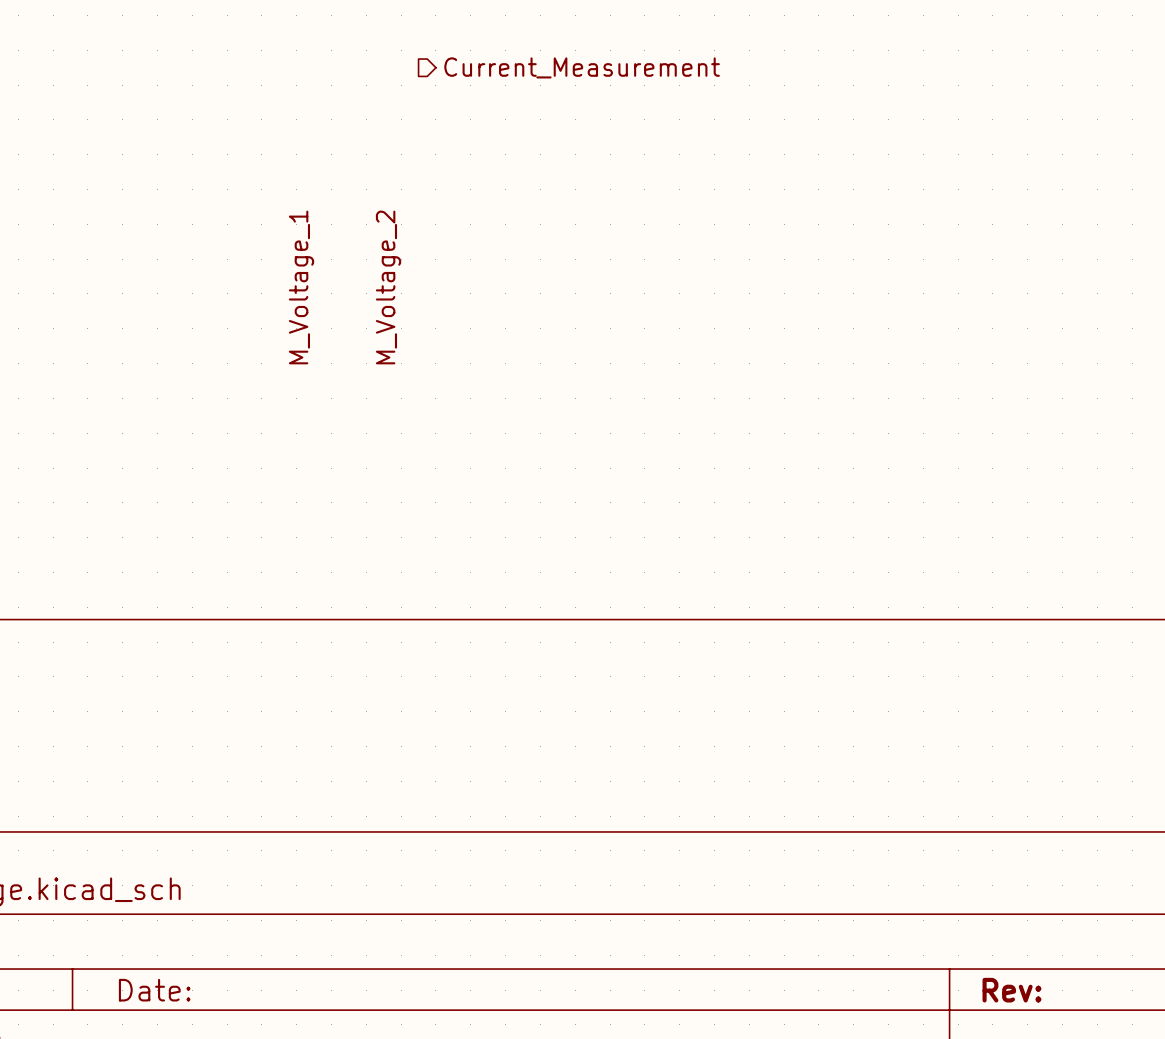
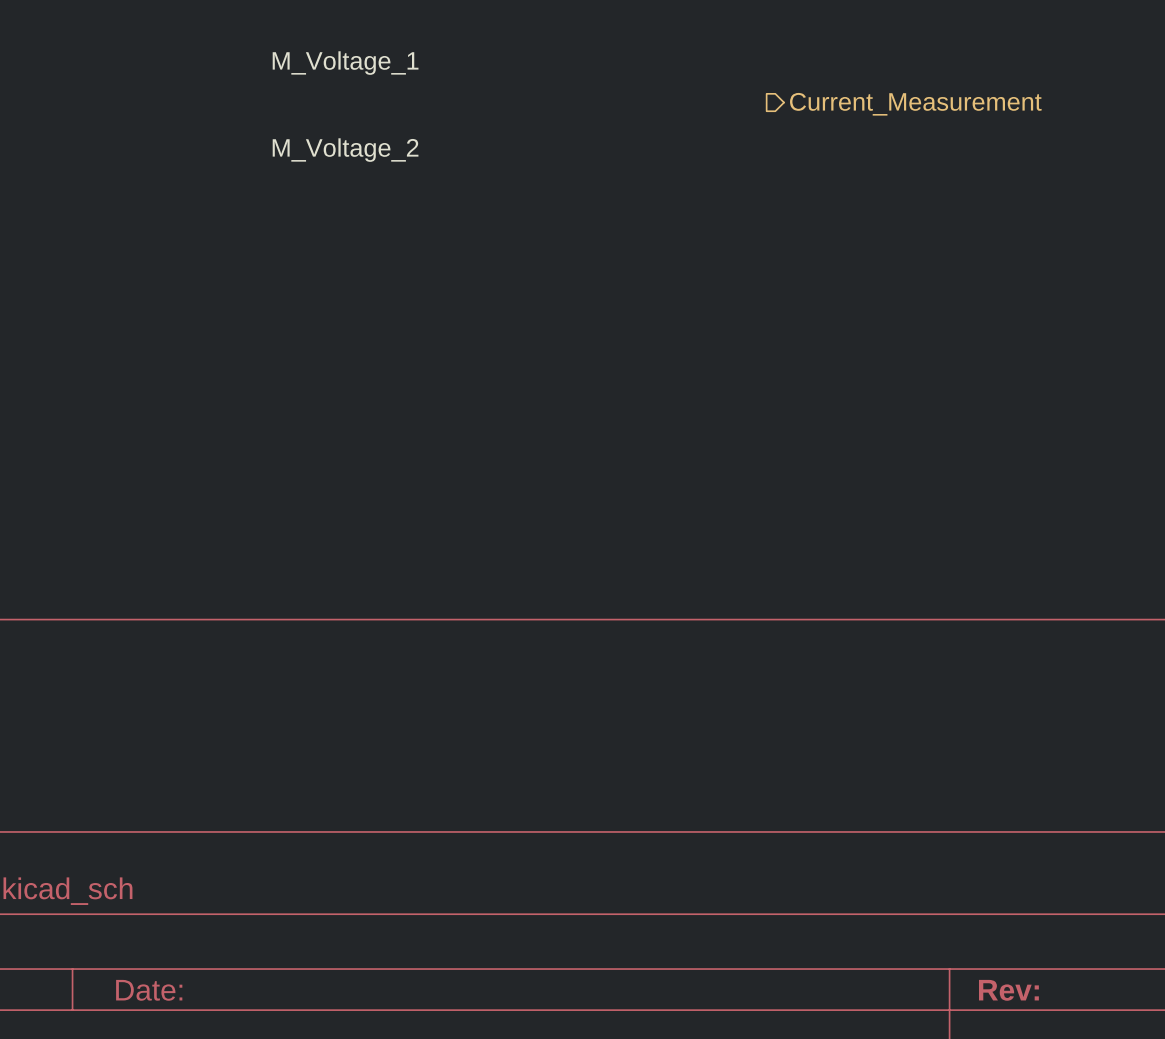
hierarchical label: Current_Measurement (582, 67) -> none
hierarchical label: none -> Current_Measurement (915, 104)
label rotation: 0° (301, 287) -> 90° clockwise (345, 63)
label position: M_Voltage_1 (301, 287) -> M_Voltage_1 (345, 63)
label rotation: 0° (388, 287) -> 90° clockwise (345, 150)

